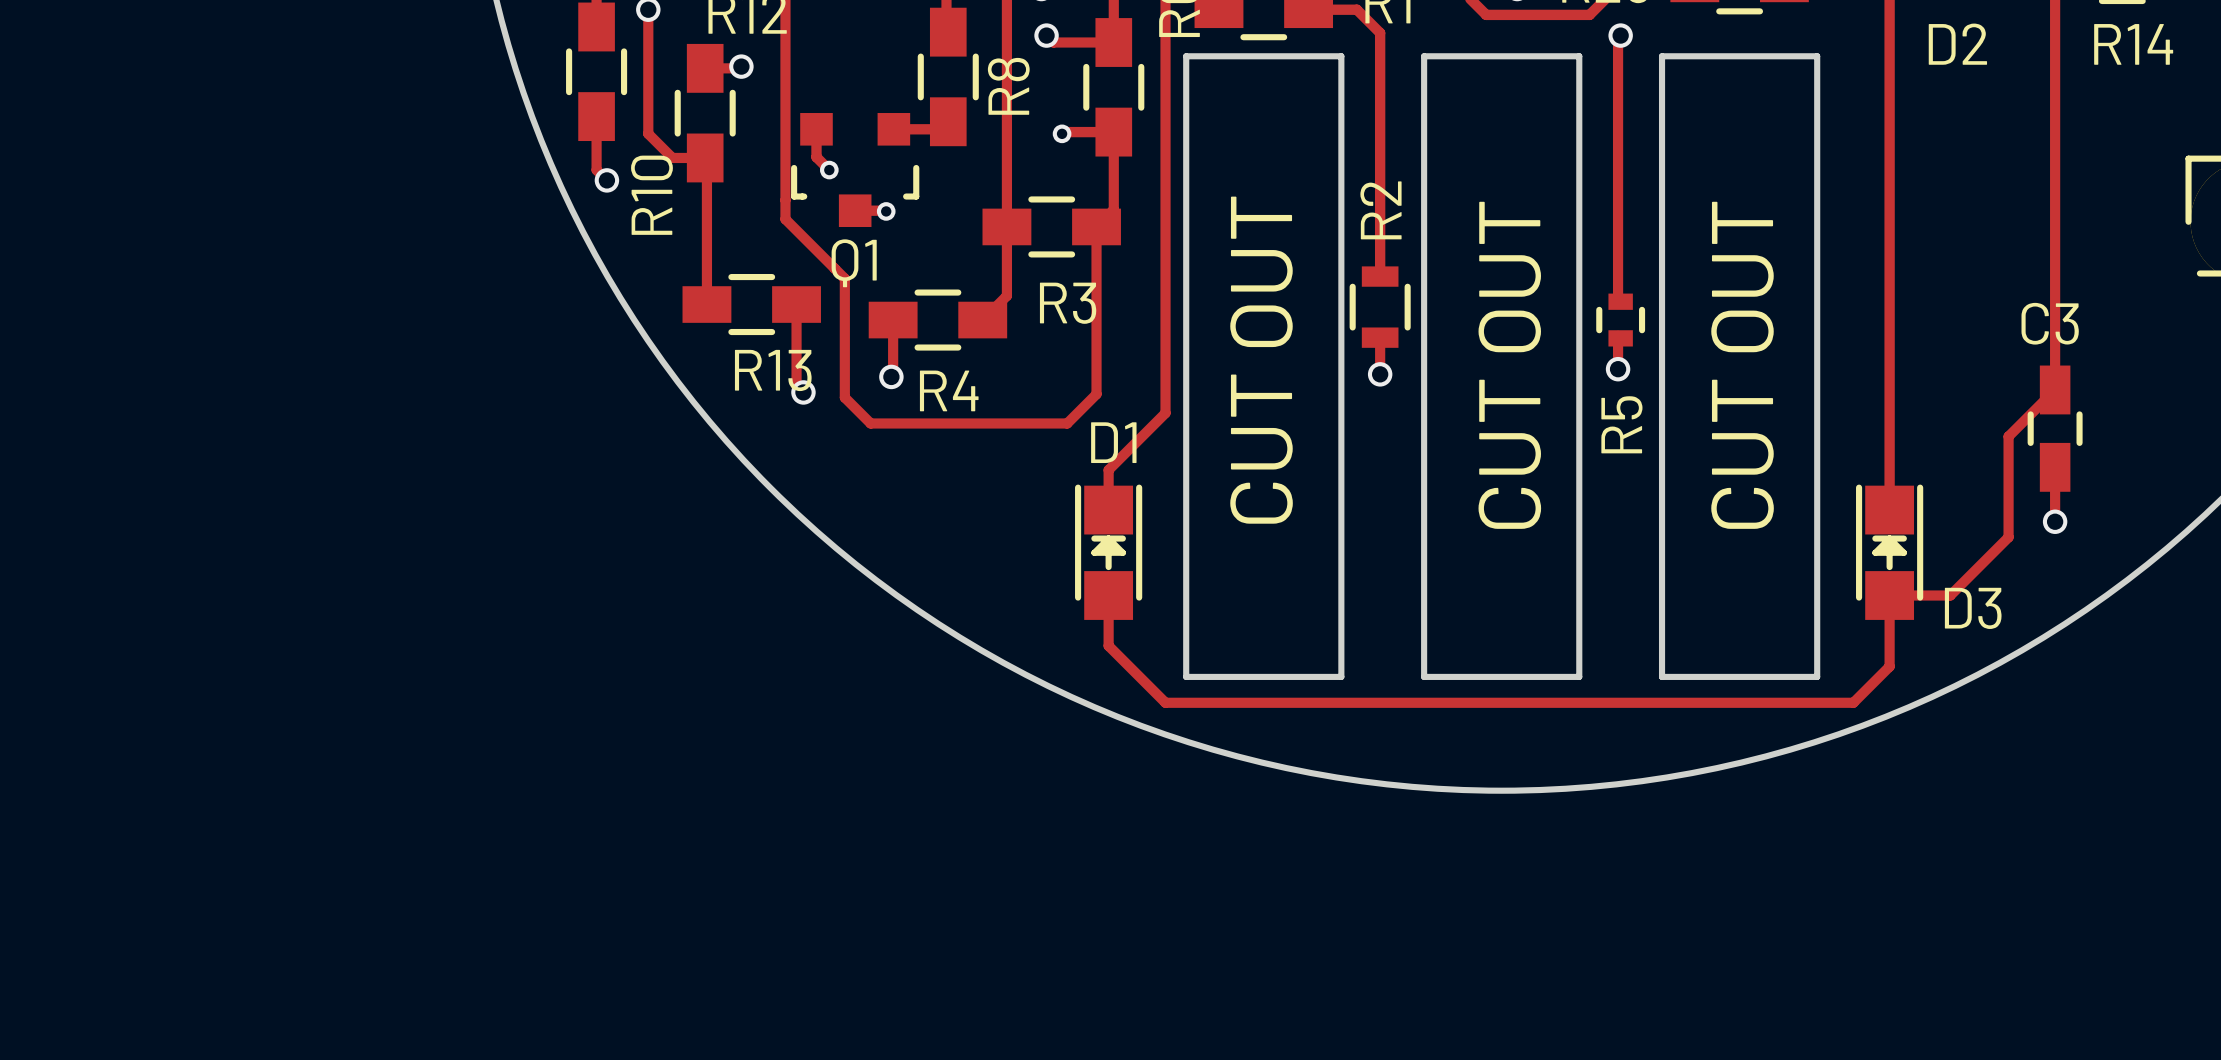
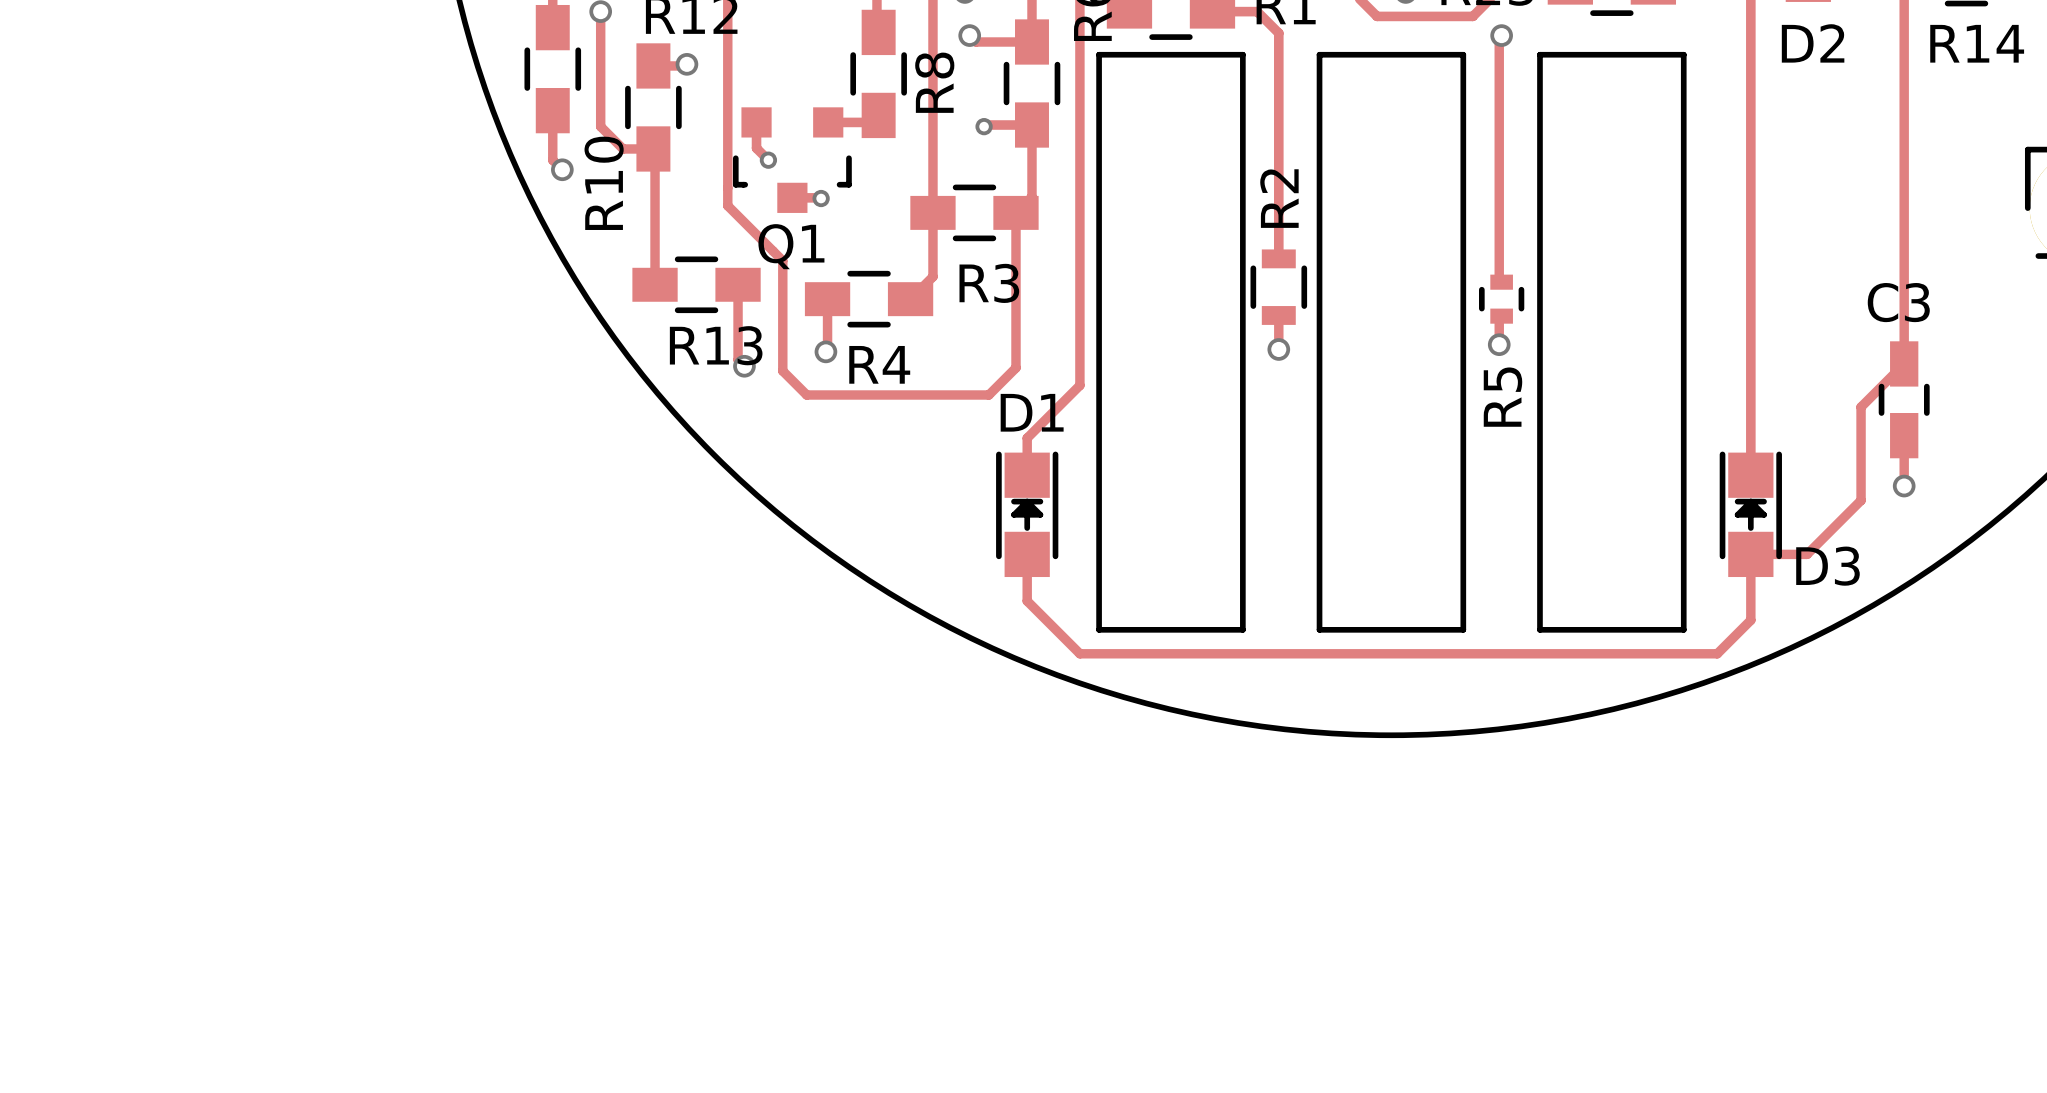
text: CUT OUT (1261, 360) -> none
text: CUT OUT (1509, 365) -> none
text: CUT OUT (1742, 365) -> none

